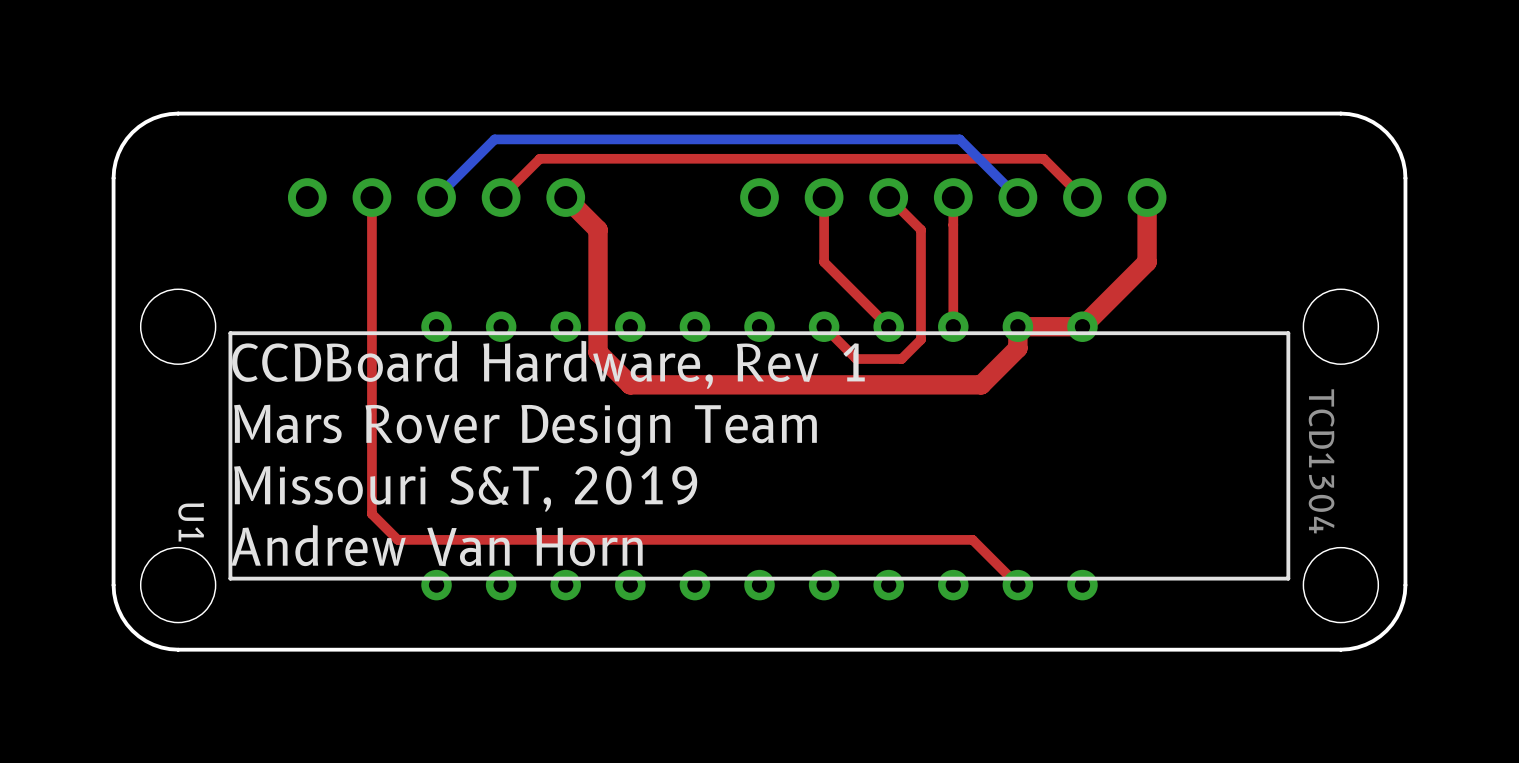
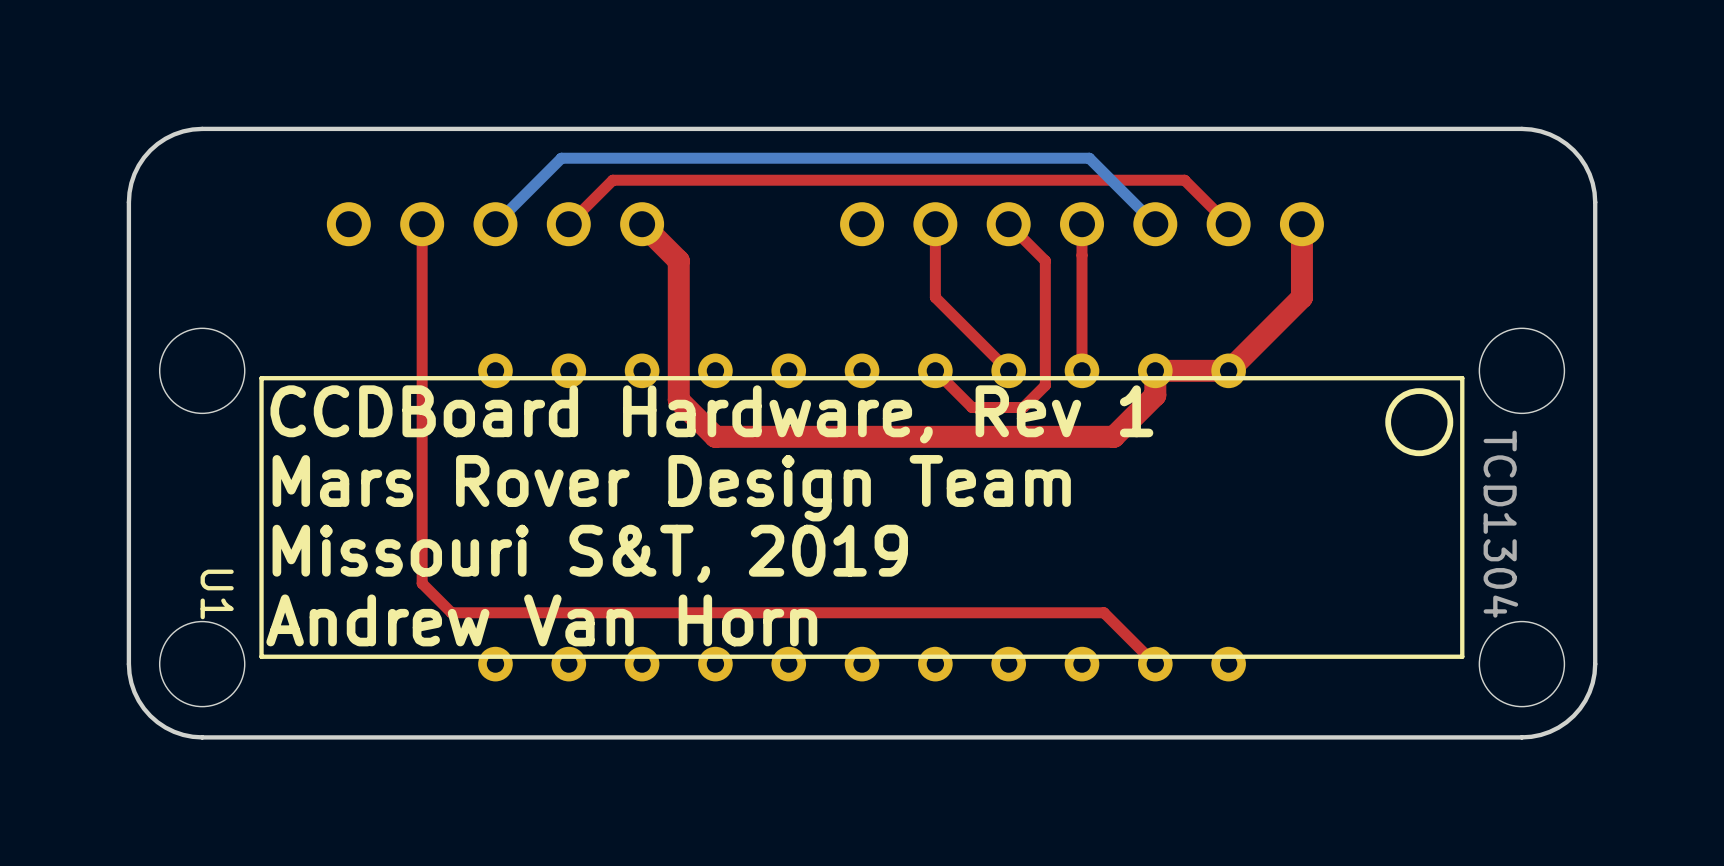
drawing: none -> [1385, 388, 1454, 457]

